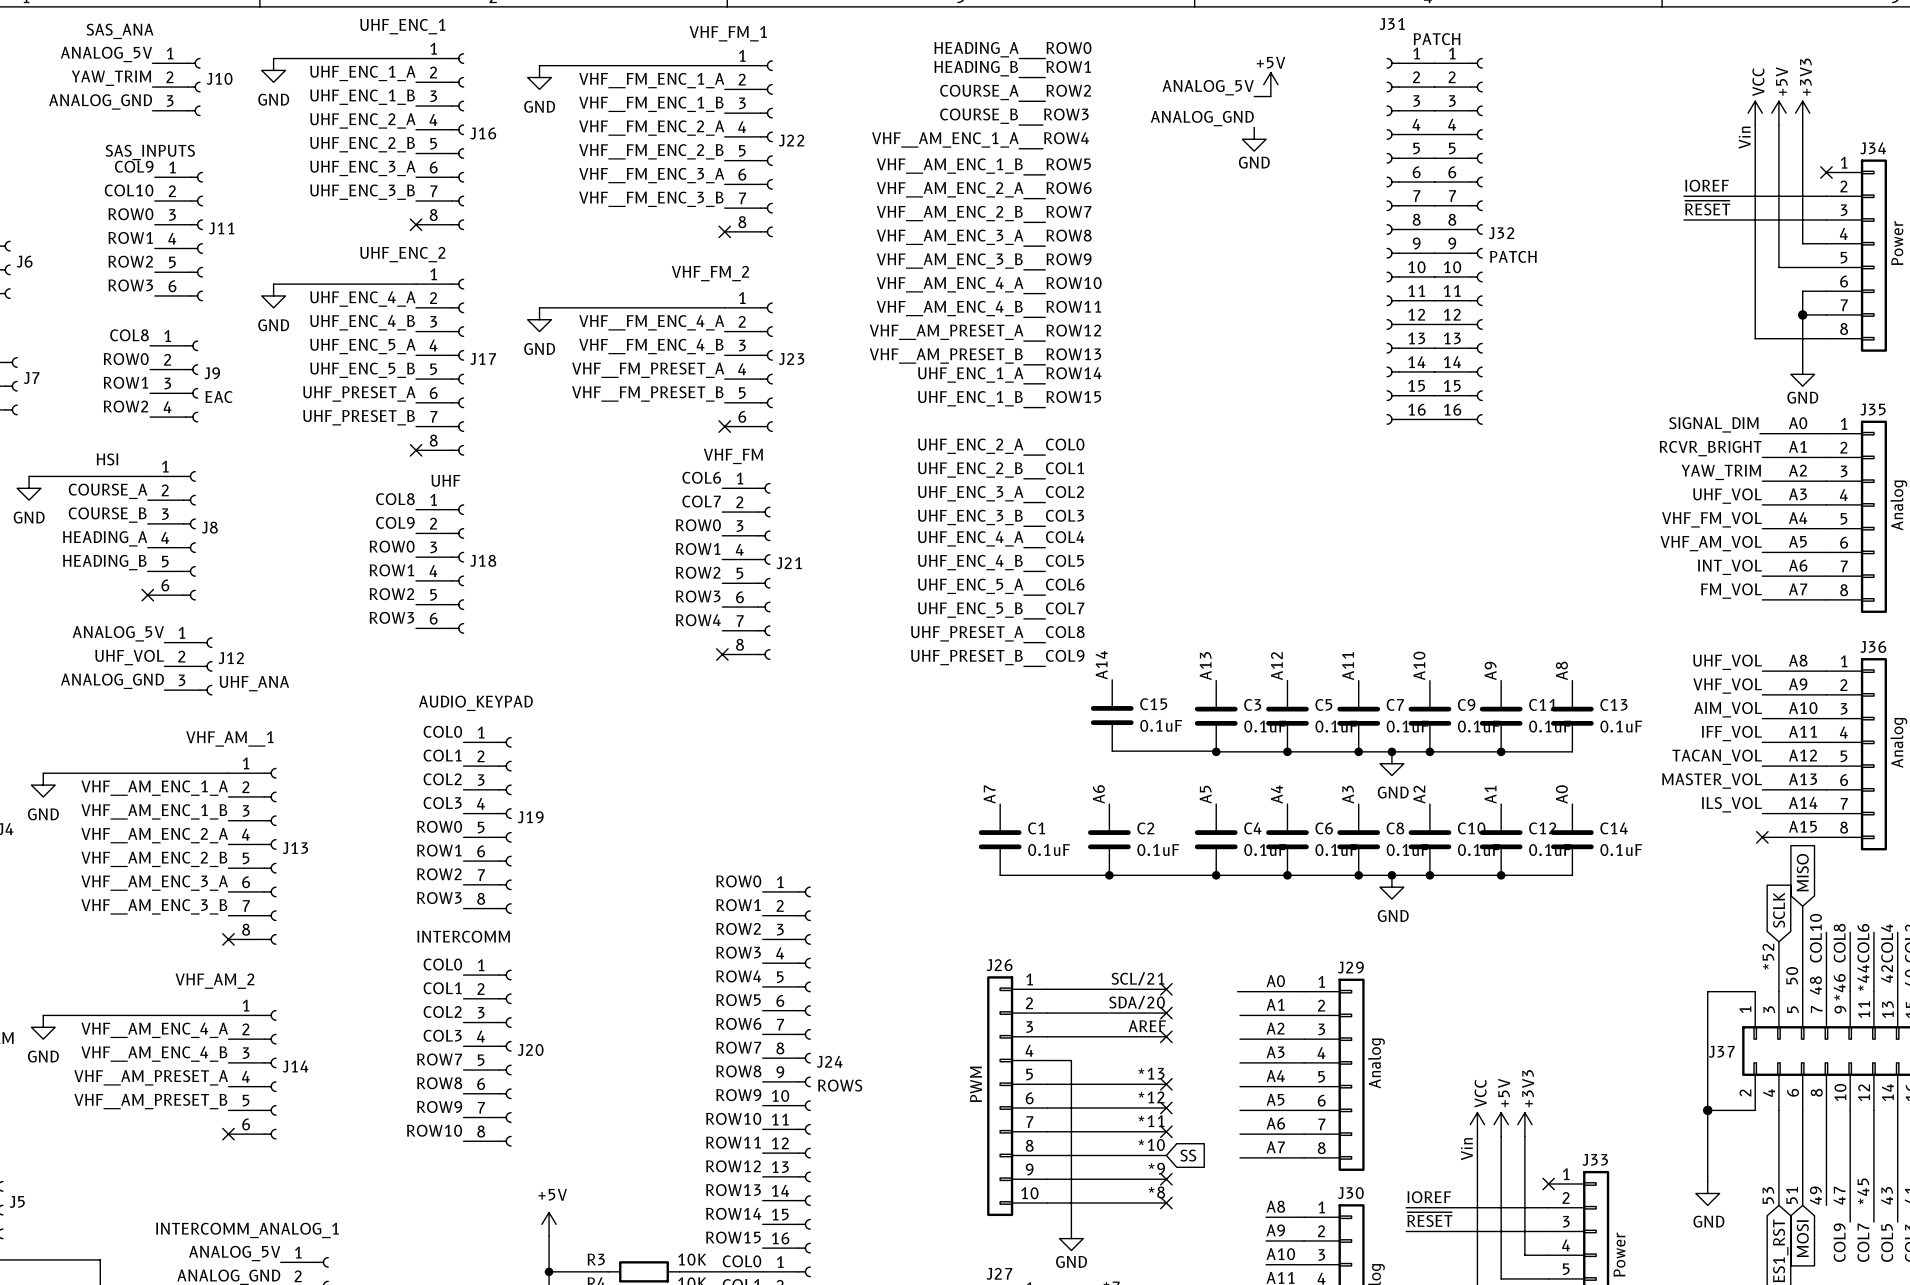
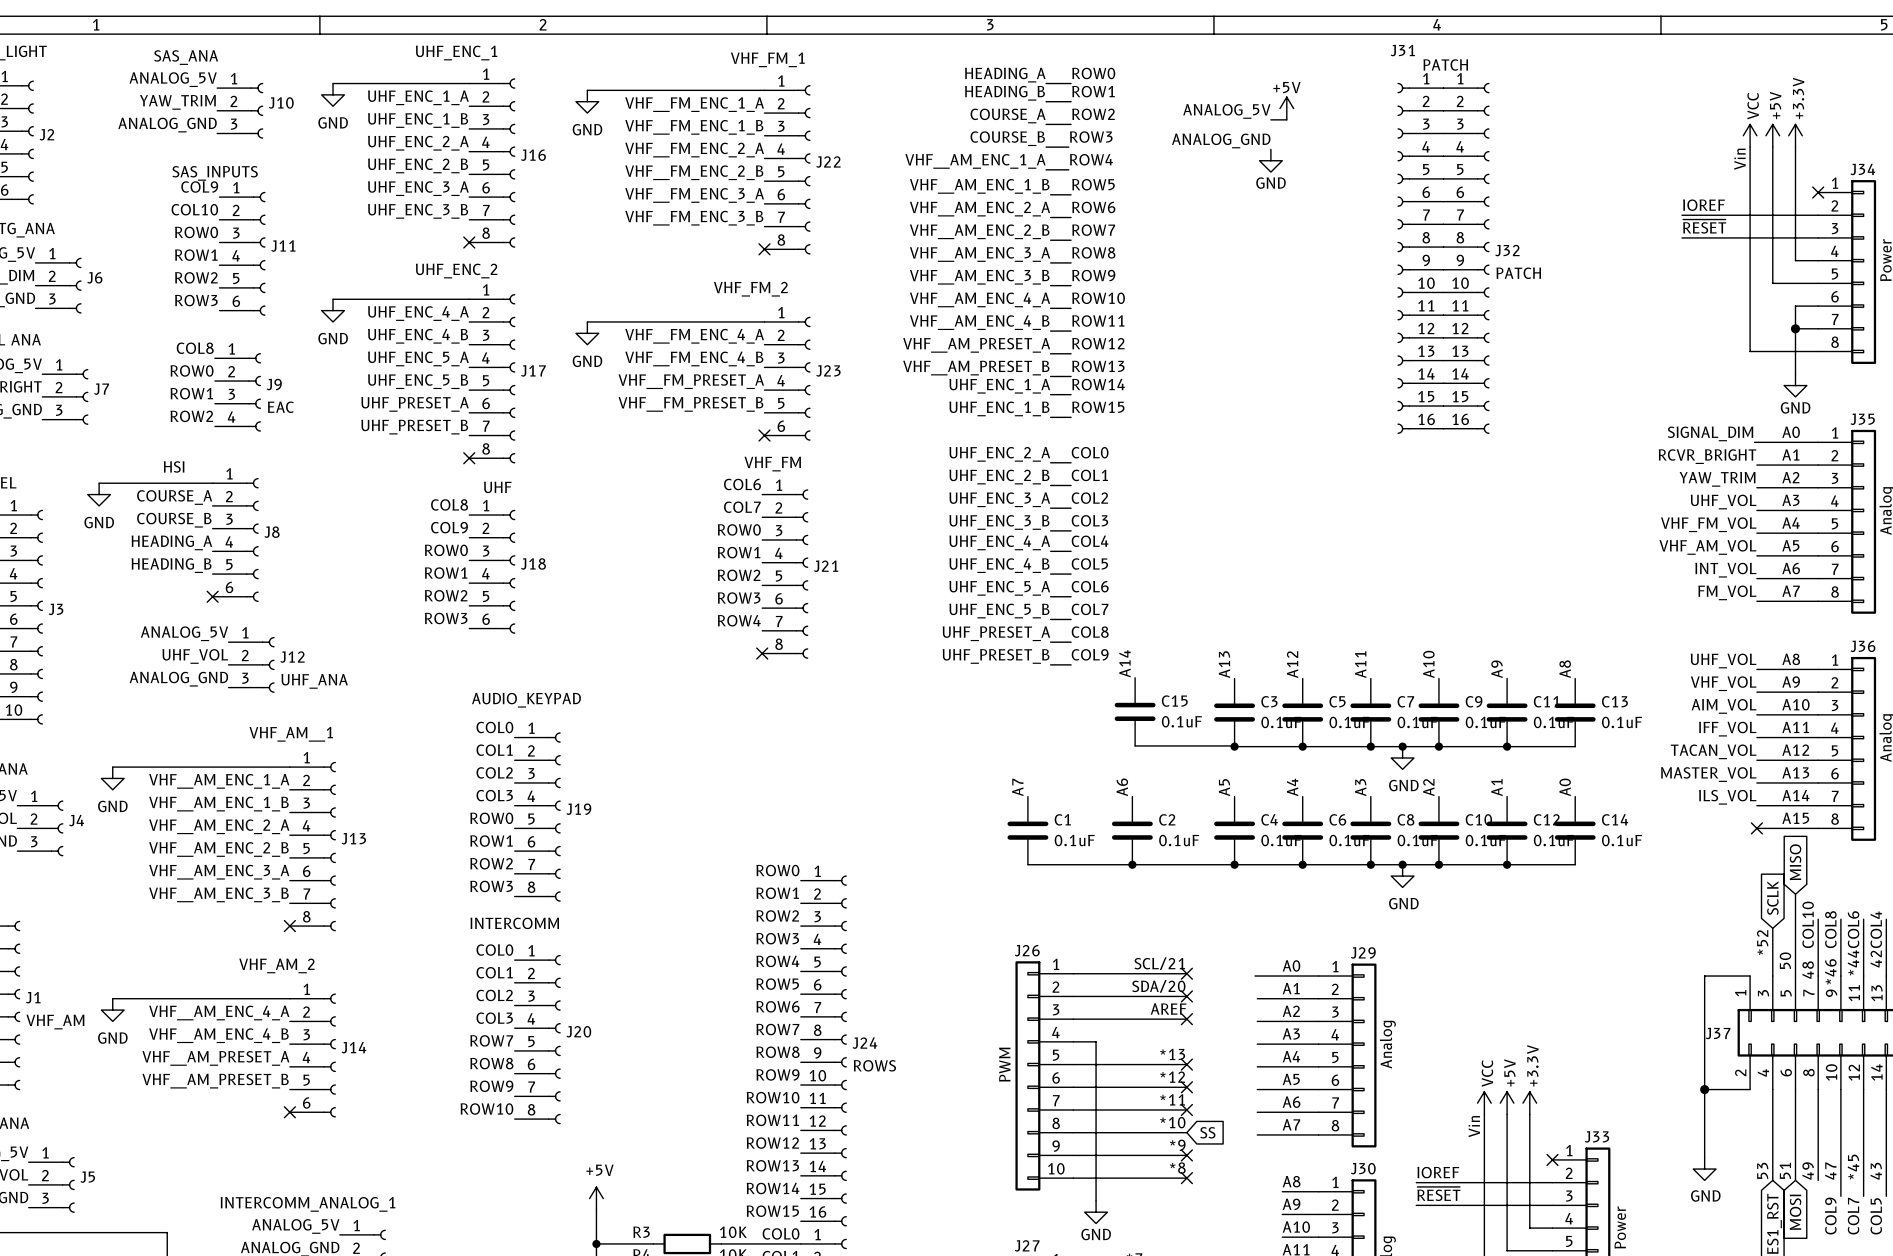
power symbol: +3V3 (1802, 113) -> +3.3V (1795, 135)
power symbol: +3V3 (1524, 1124) -> +3.3V (1529, 1103)

